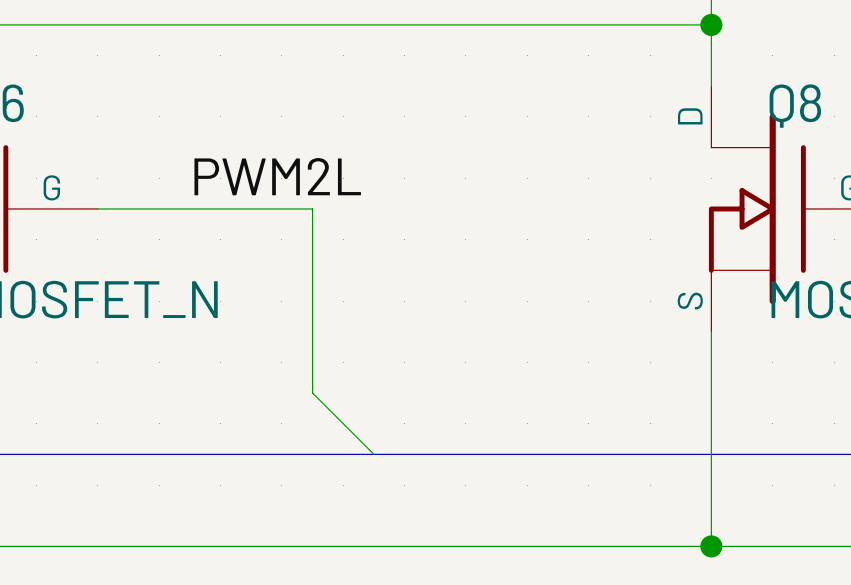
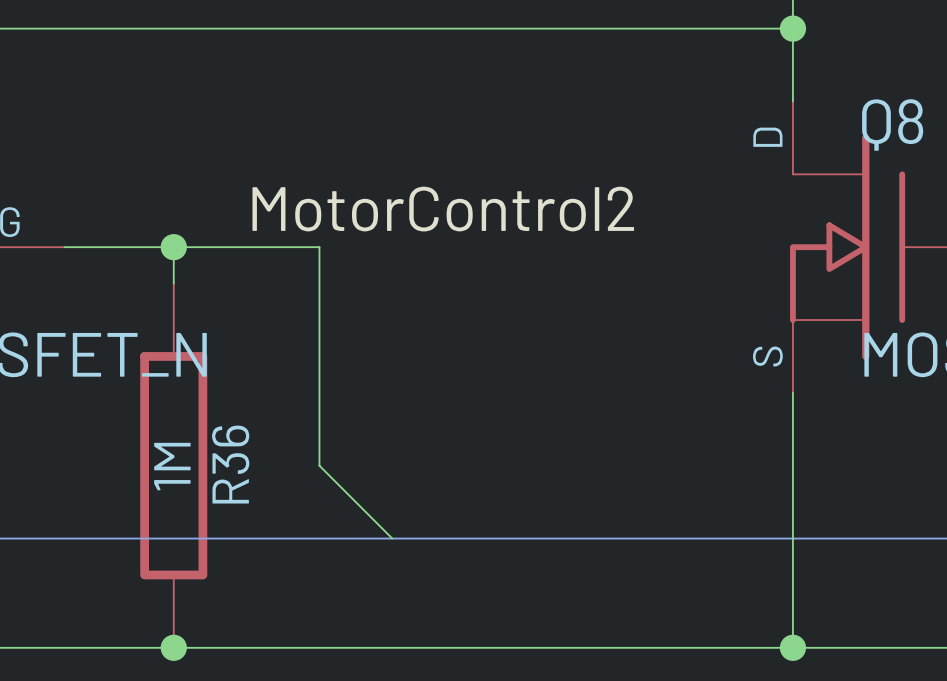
label: PWM2L (277, 176) -> none
label: none -> MotorControl2 (443, 209)
wire: none -> (173, 247) (173, 283)
junction: none -> (173, 247)
R36: none -> 1M (173, 465)
junction: none -> (173, 647)

